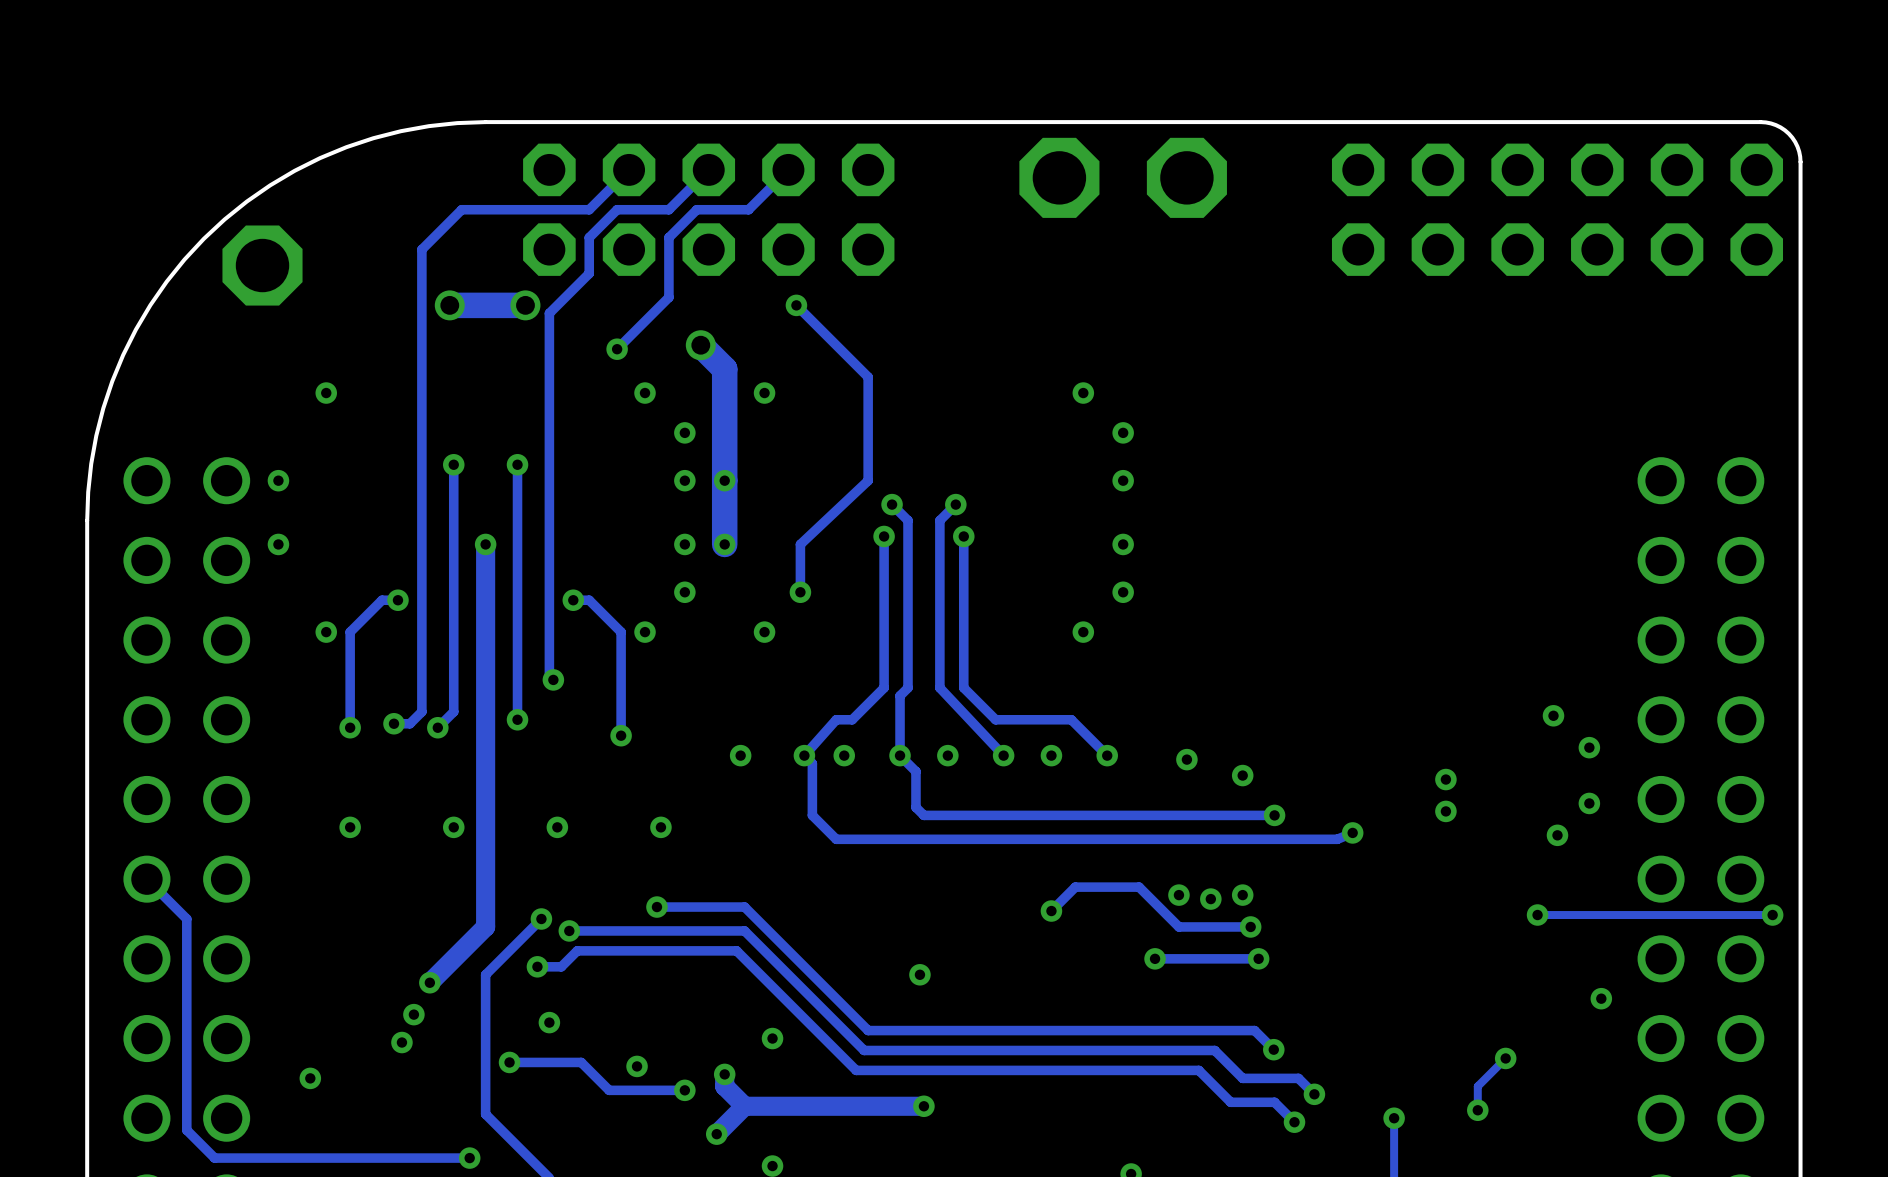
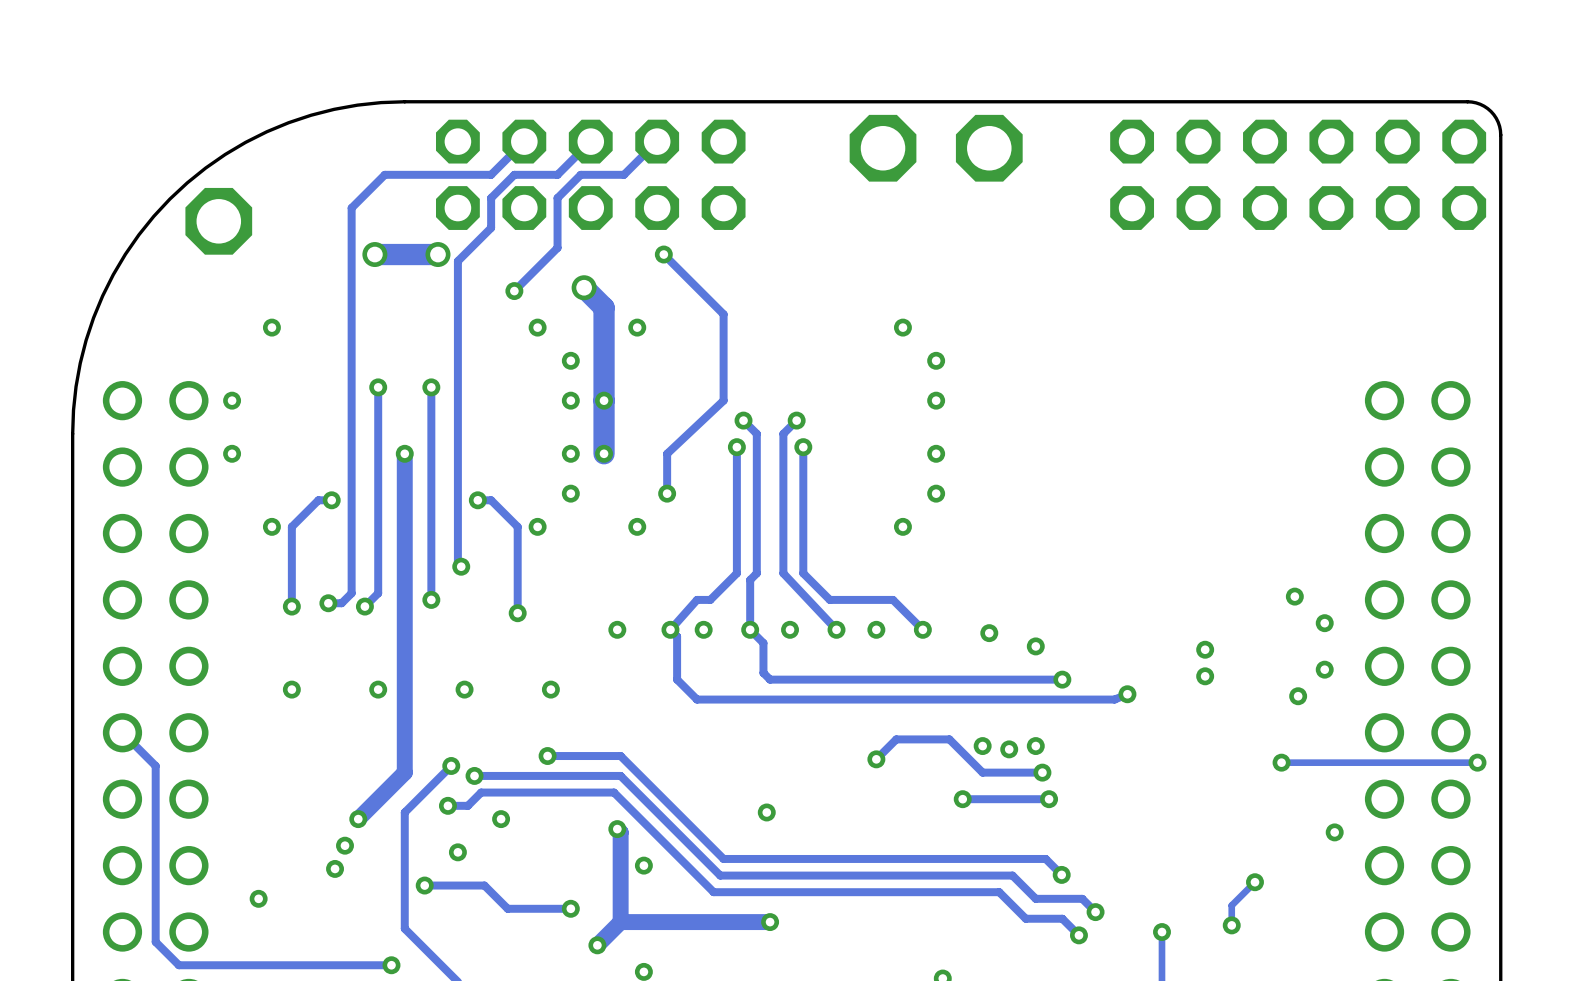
via: none -> (501, 819)
via: none -> (617, 829)
via: (637, 1066) -> none
track: (724, 1074) (724, 1086) (744, 1106) -> (617, 829) (620, 832) (620, 922)
via: (724, 1074) -> none

